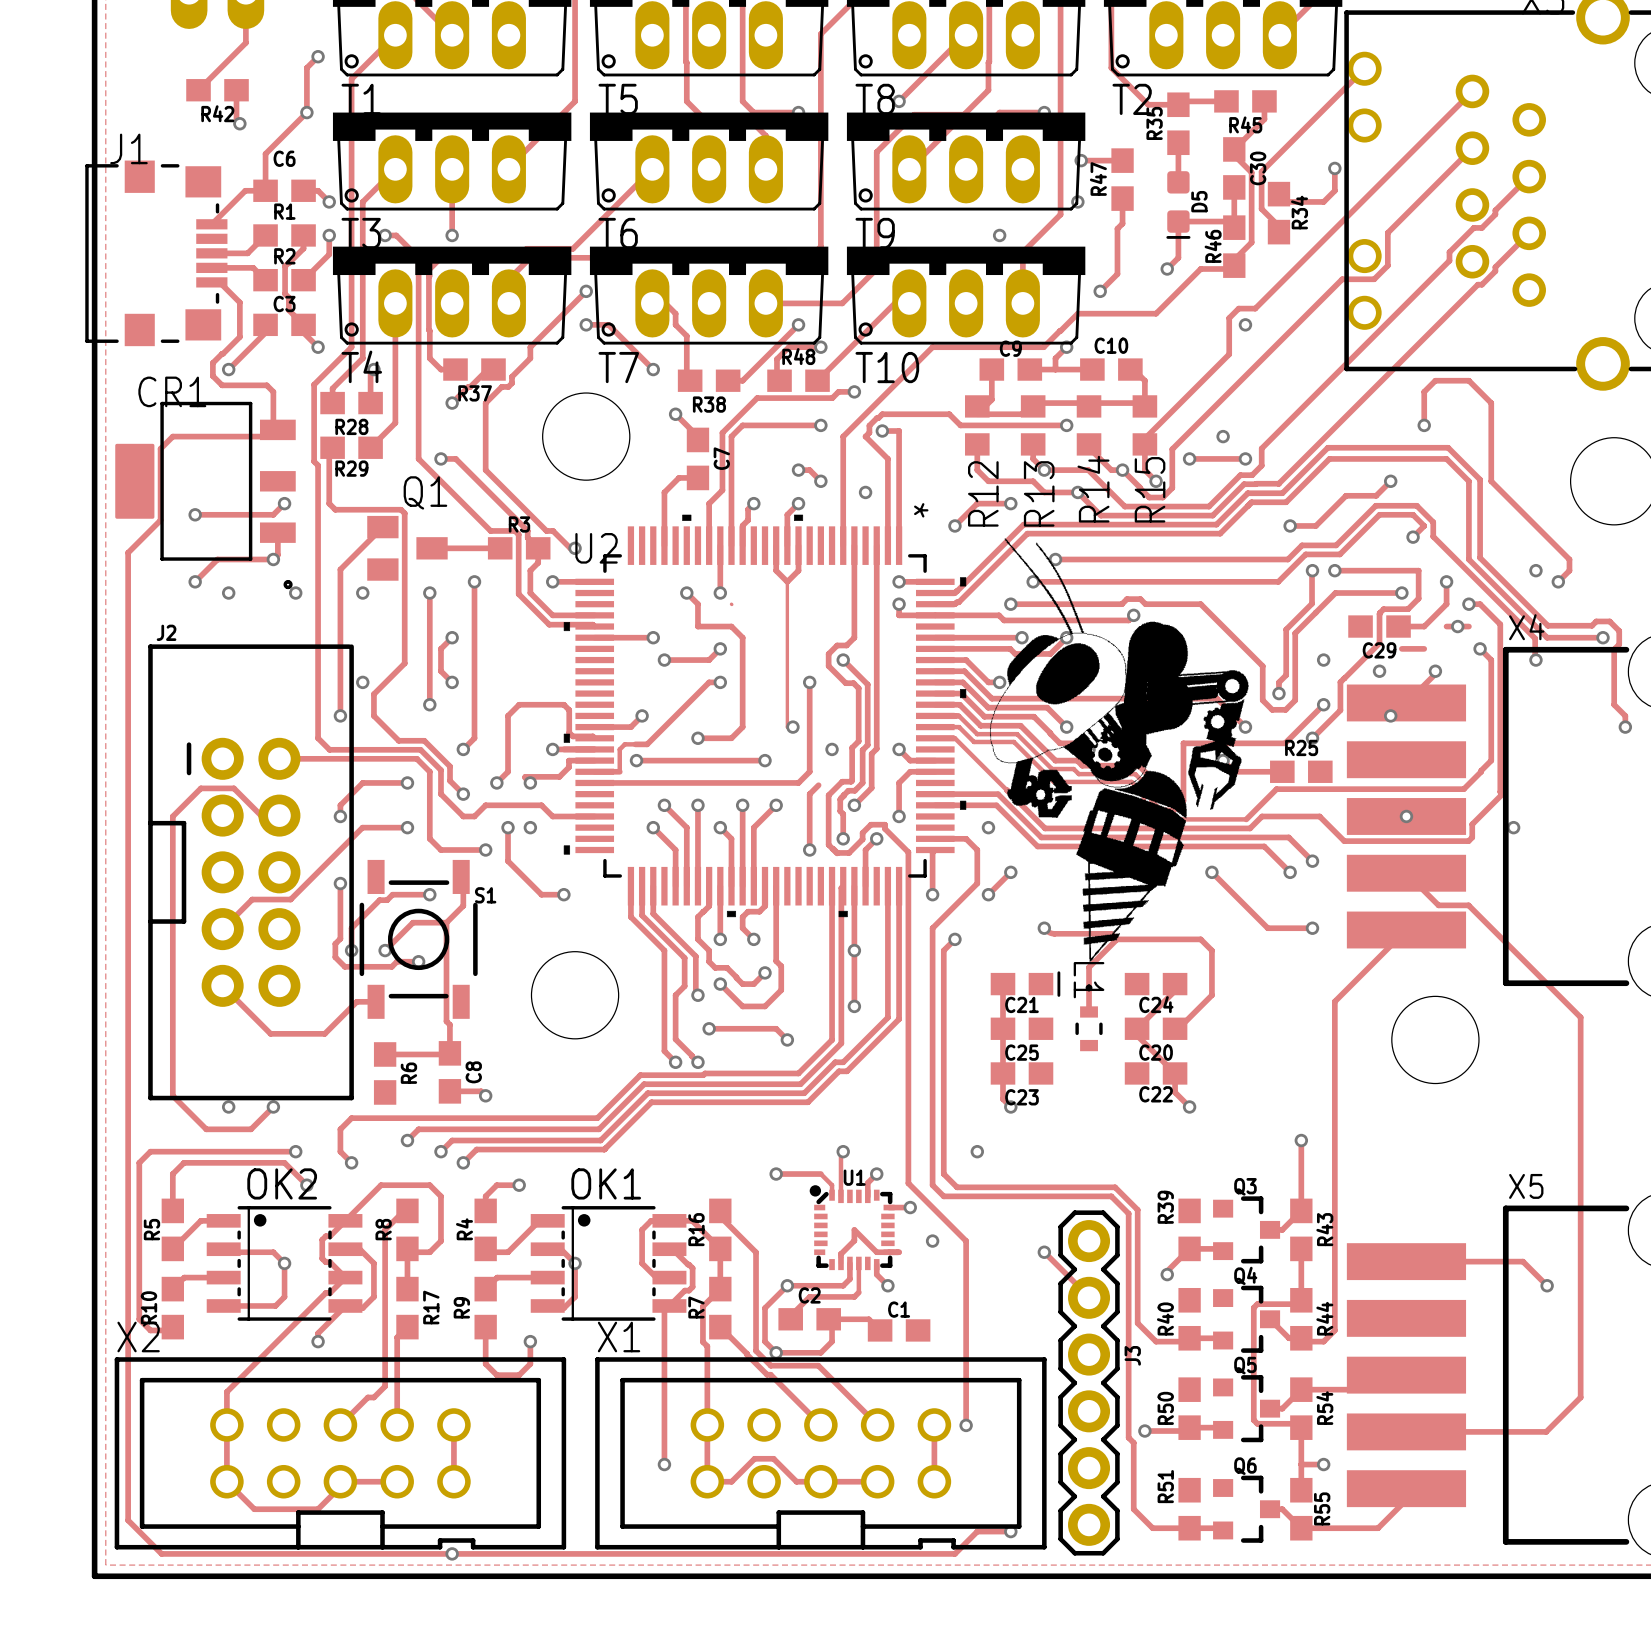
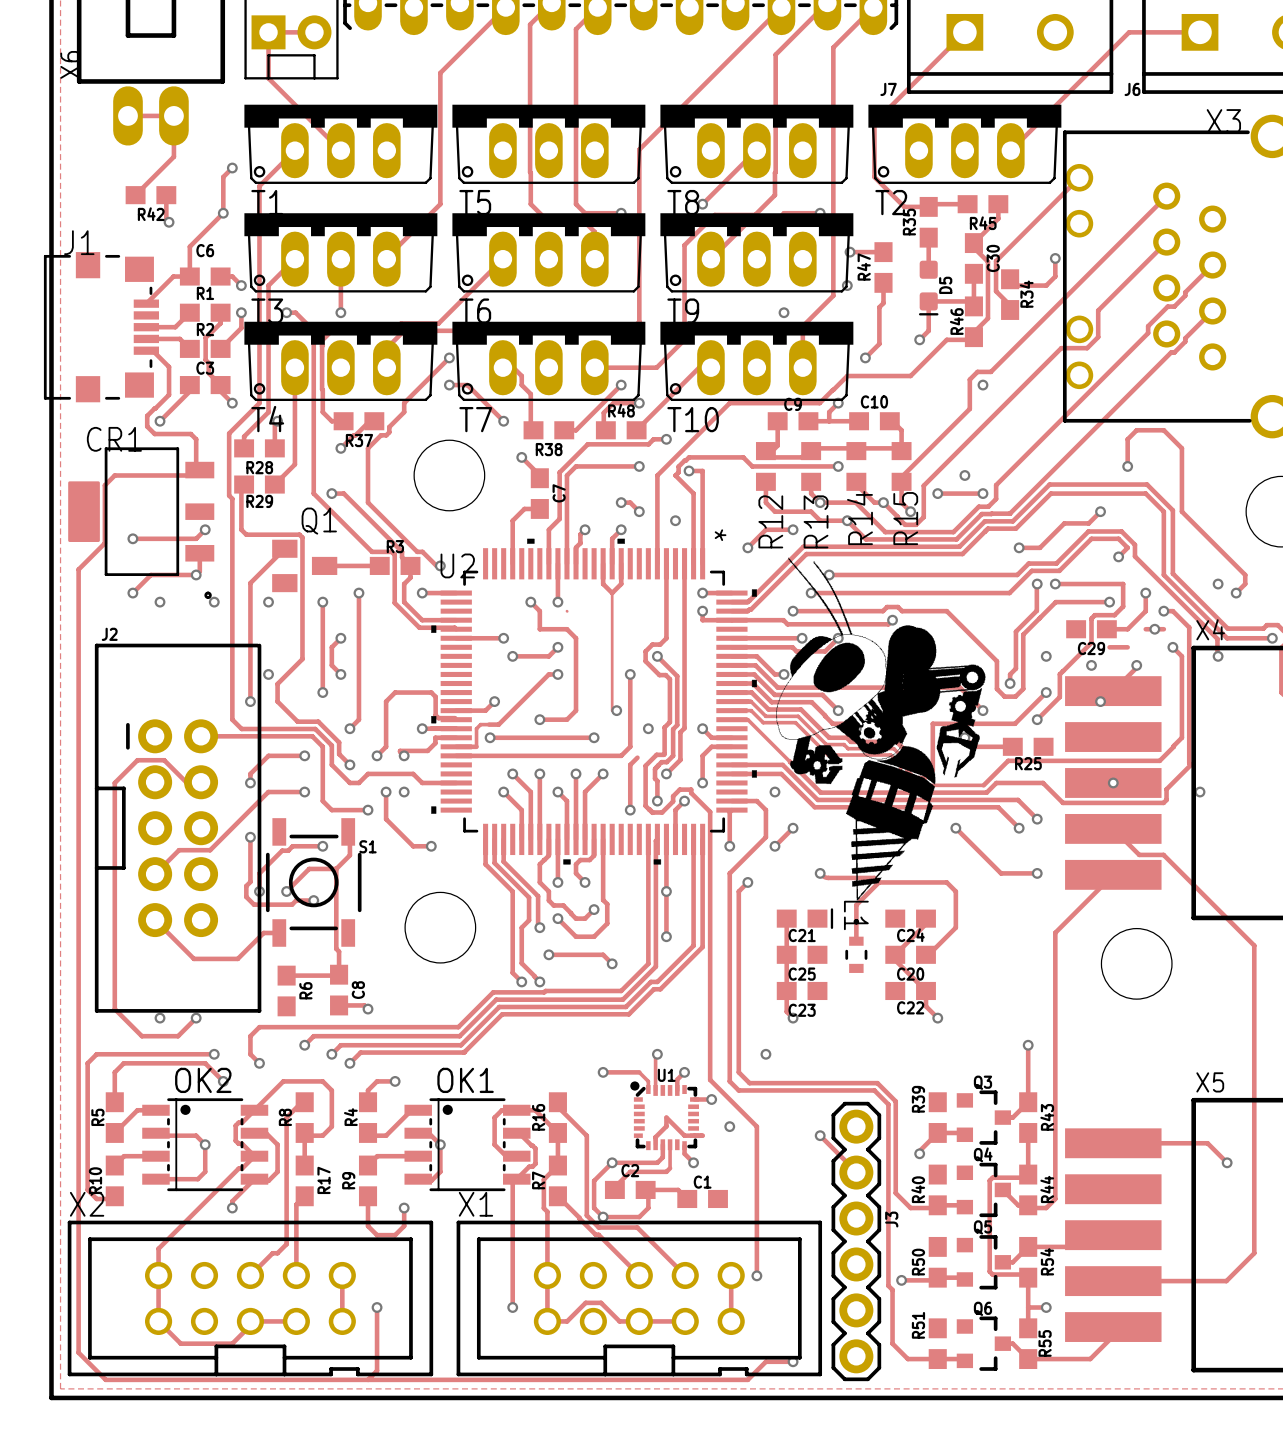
R25 name position: R25 (1301, 747) -> R25 (1028, 763)
track: none -> (377, 1307) (377, 1370) (368, 1379)
via position: (452, 1553) -> (377, 1307)

